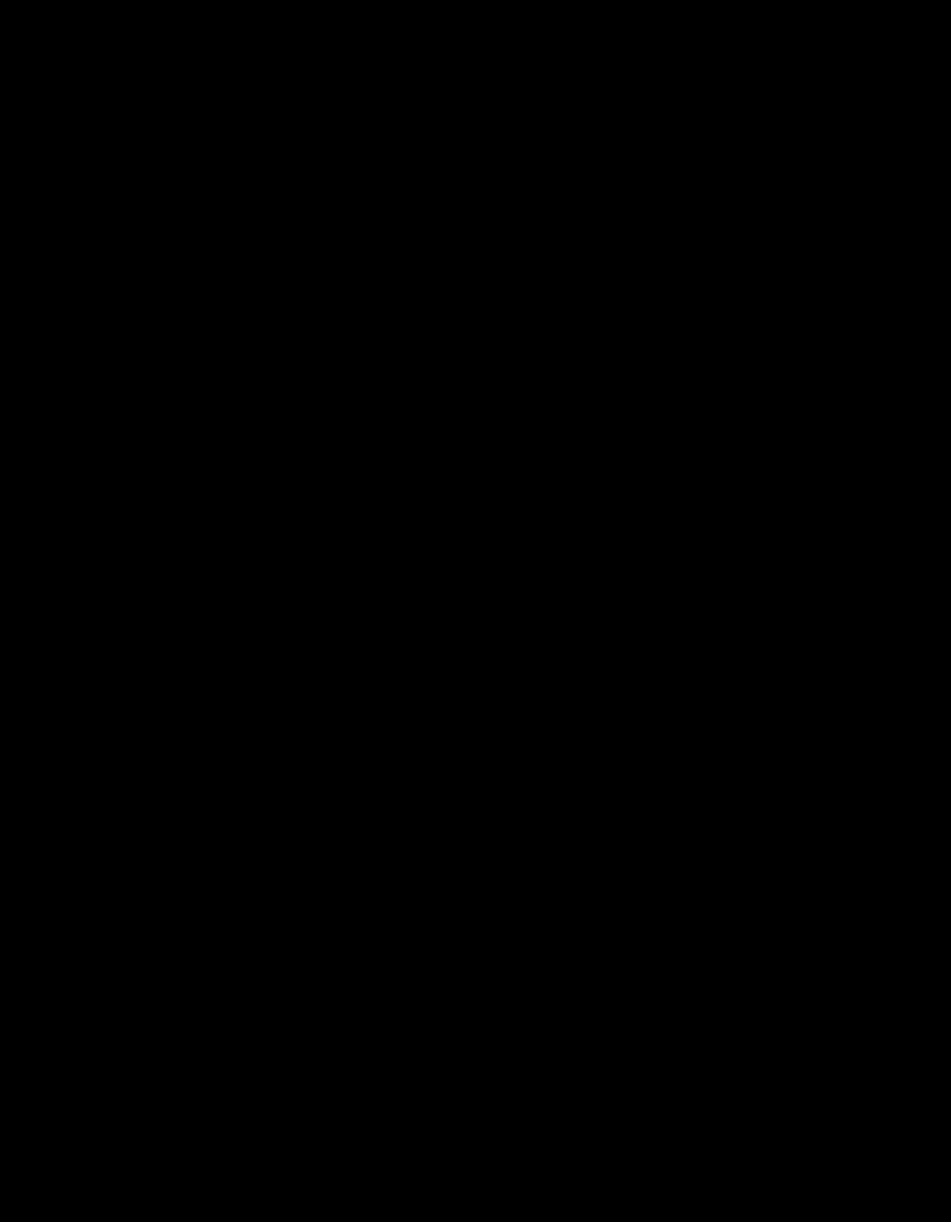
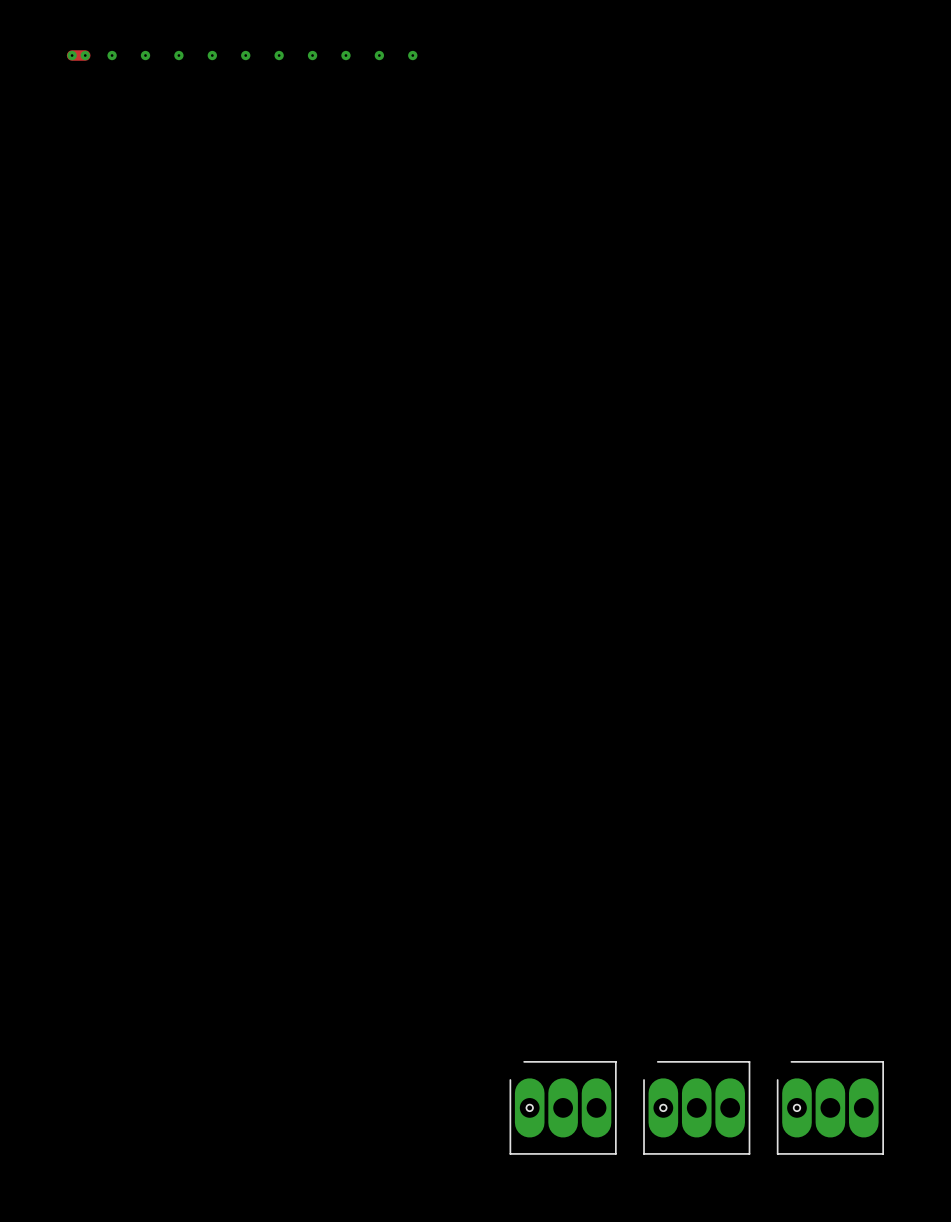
part: none -> (78, 55)
part: none -> (112, 55)
part: none -> (145, 55)
part: none -> (178, 55)
part: none -> (212, 55)
part: none -> (245, 55)
part: none -> (279, 55)
part: none -> (312, 55)
part: none -> (345, 55)
part: none -> (379, 55)
part: none -> (412, 55)
part: none -> (563, 1107)
part: none -> (696, 1107)
part: none -> (830, 1107)

